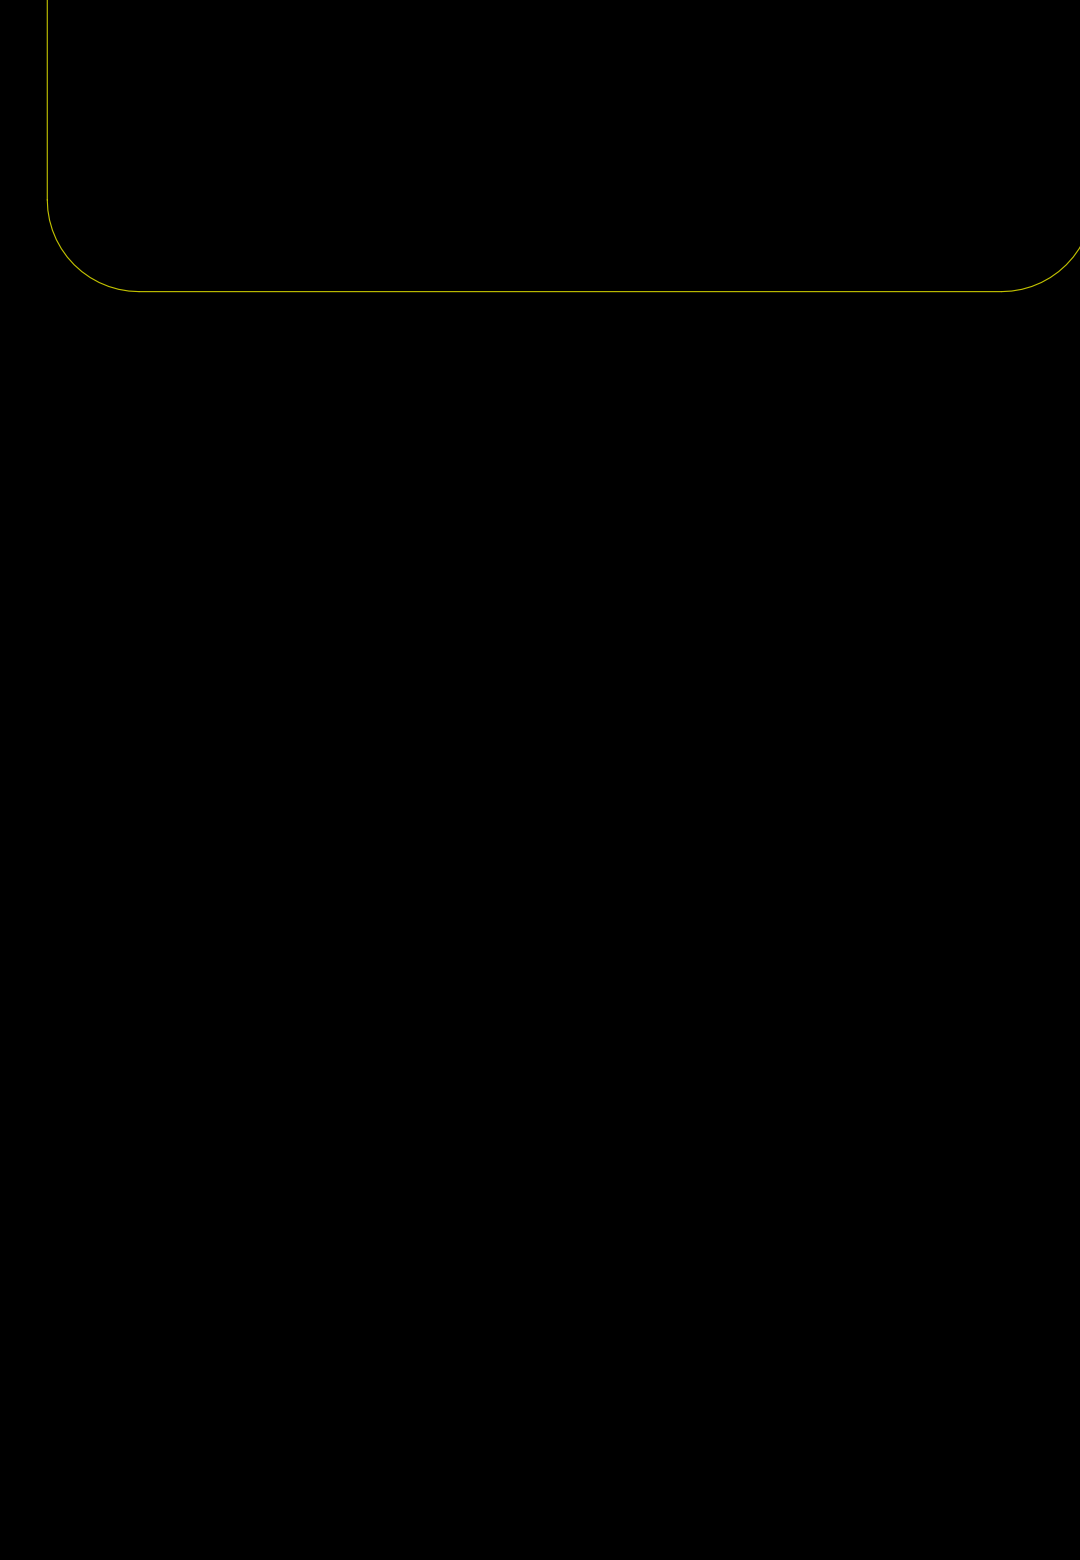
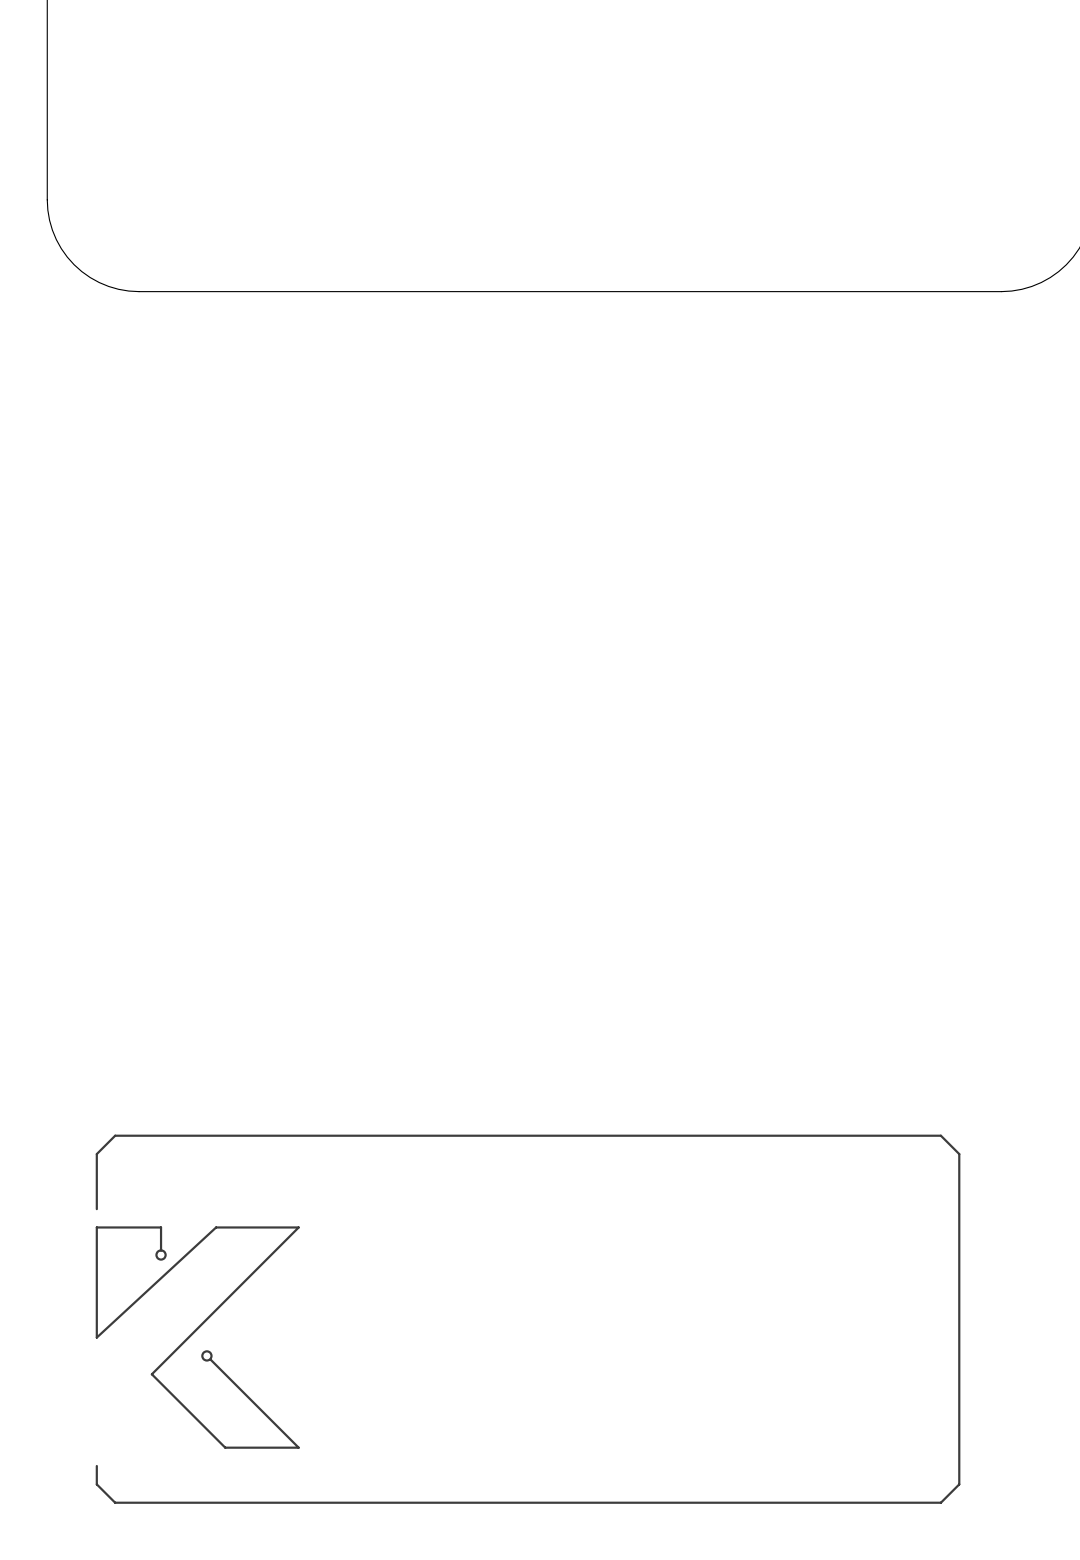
line: none -> (96, 1209) (96, 1154) (115, 1135) (940, 1135) (959, 1154) (959, 1484) (940, 1502) (115, 1502) (96, 1484) (96, 1466)
drawing: none -> [155, 1249, 167, 1261]
line: none -> (161, 1250) (161, 1227) (96, 1227) (96, 1337) (216, 1227) (298, 1227) (151, 1374) (225, 1447) (298, 1447) (210, 1359)
drawing: none -> [201, 1350, 213, 1362]

